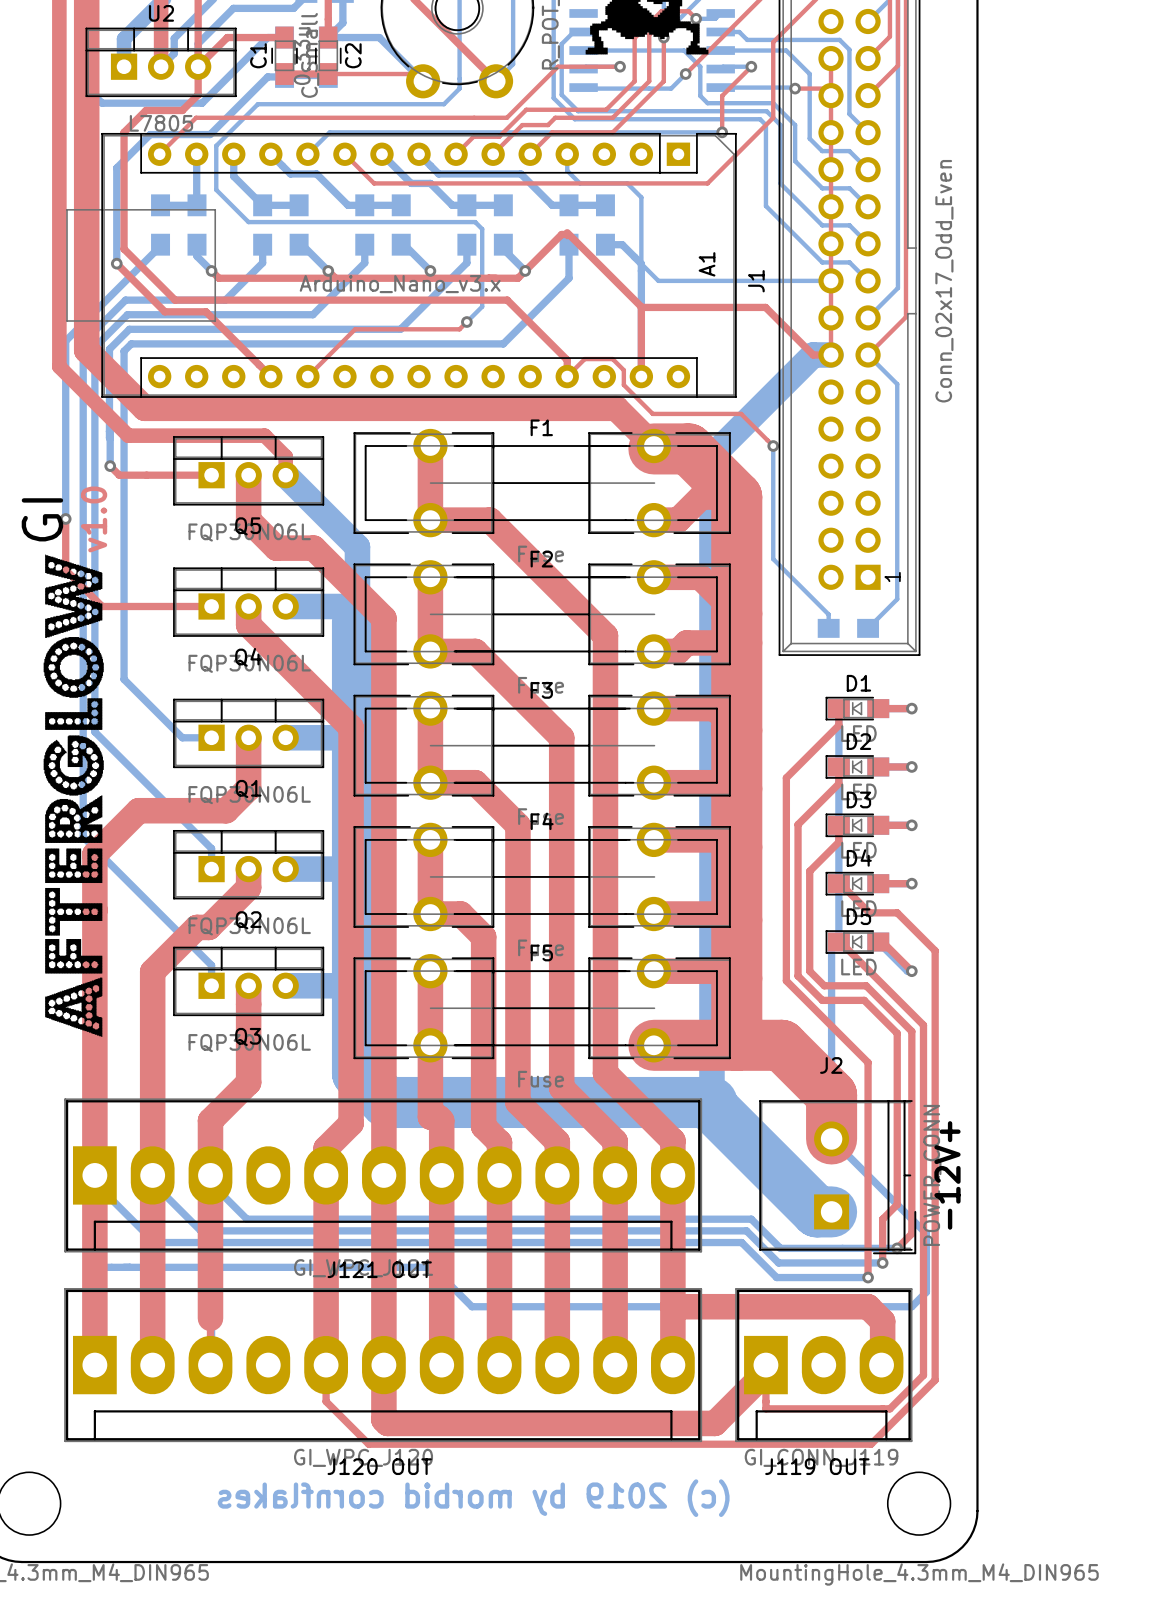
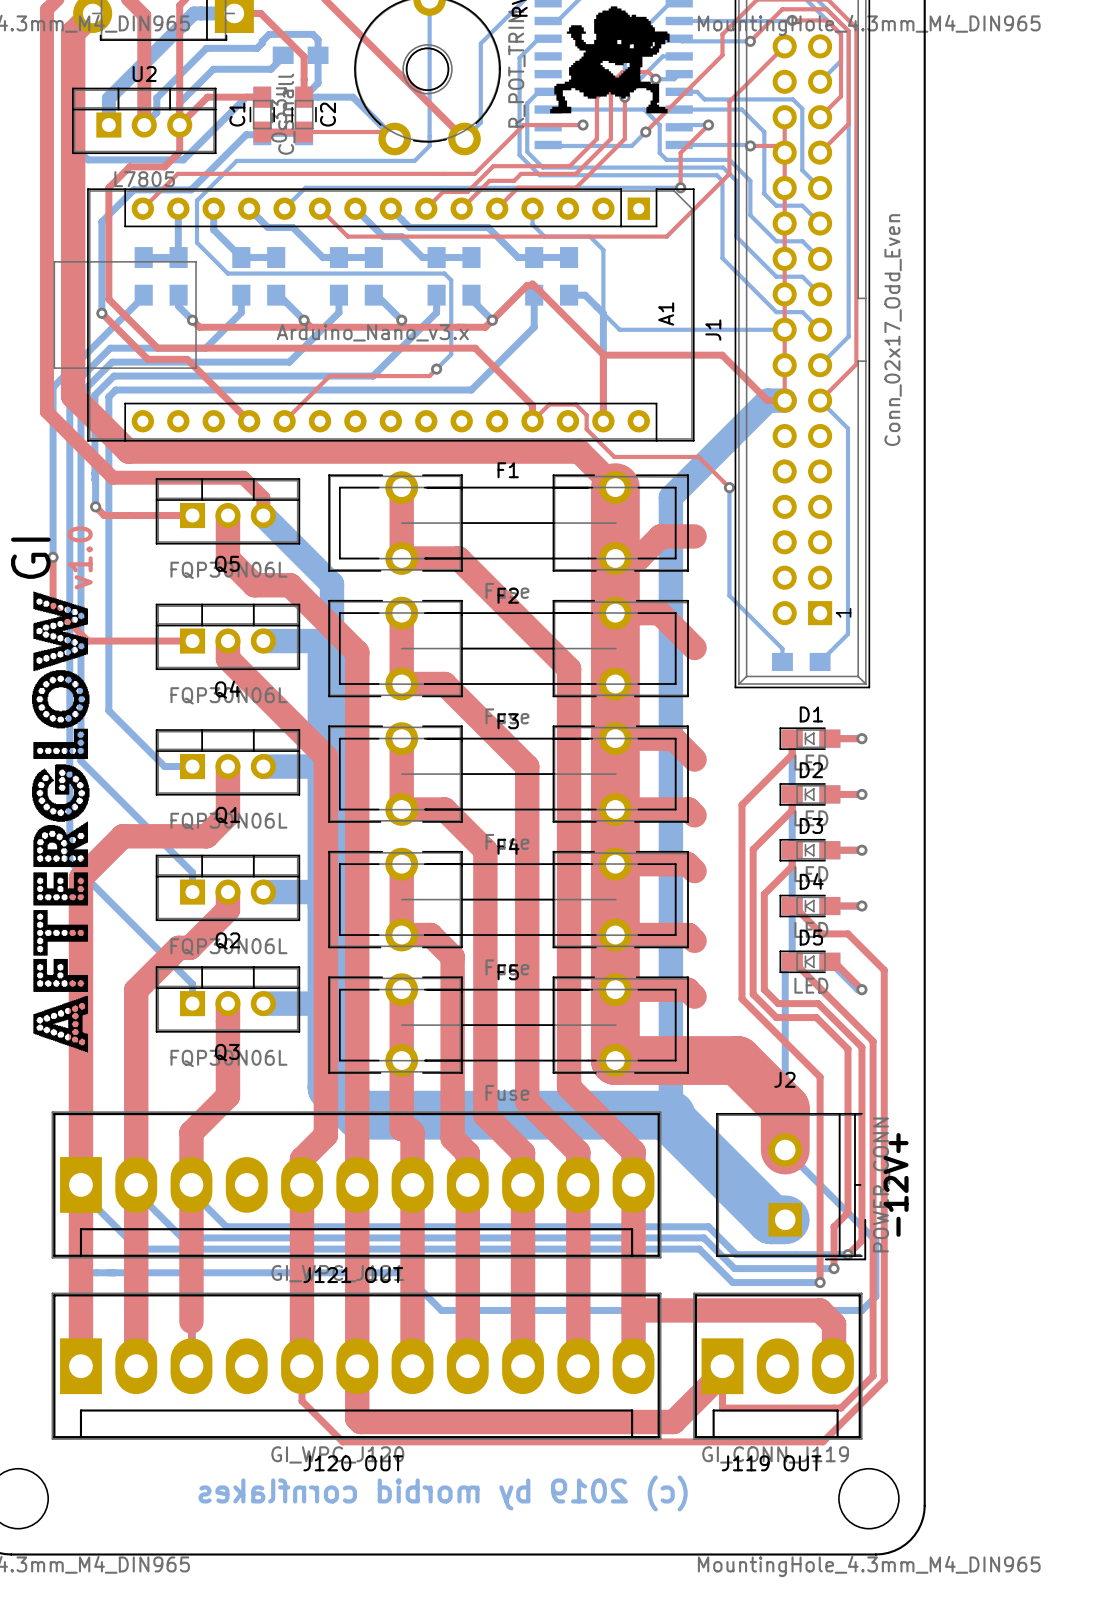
top track: none -> (615, 487) (615, 1060)
top track: (653, 448) (688, 448) (736, 497) (736, 1045) -> none
top track: (736, 642) (686, 642) (678, 651) (653, 651) -> none

